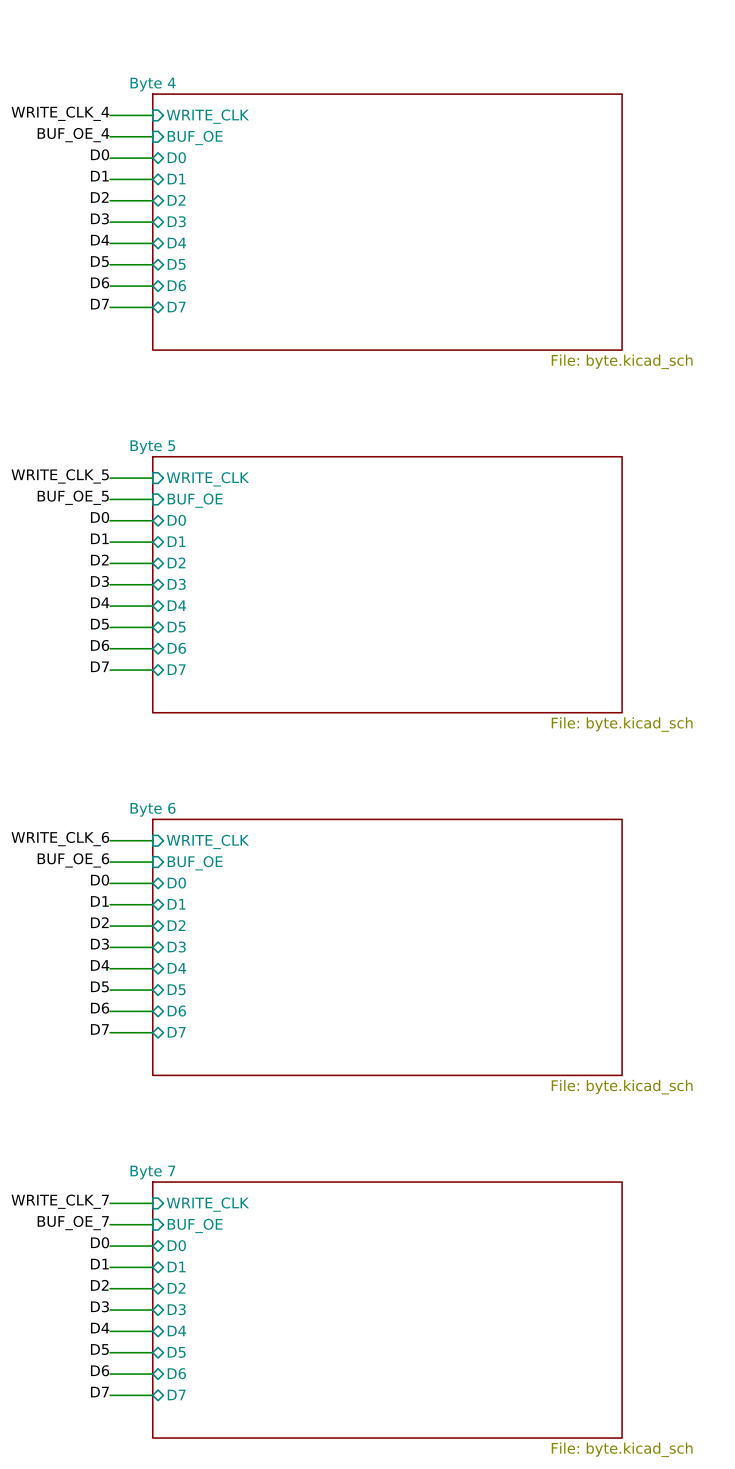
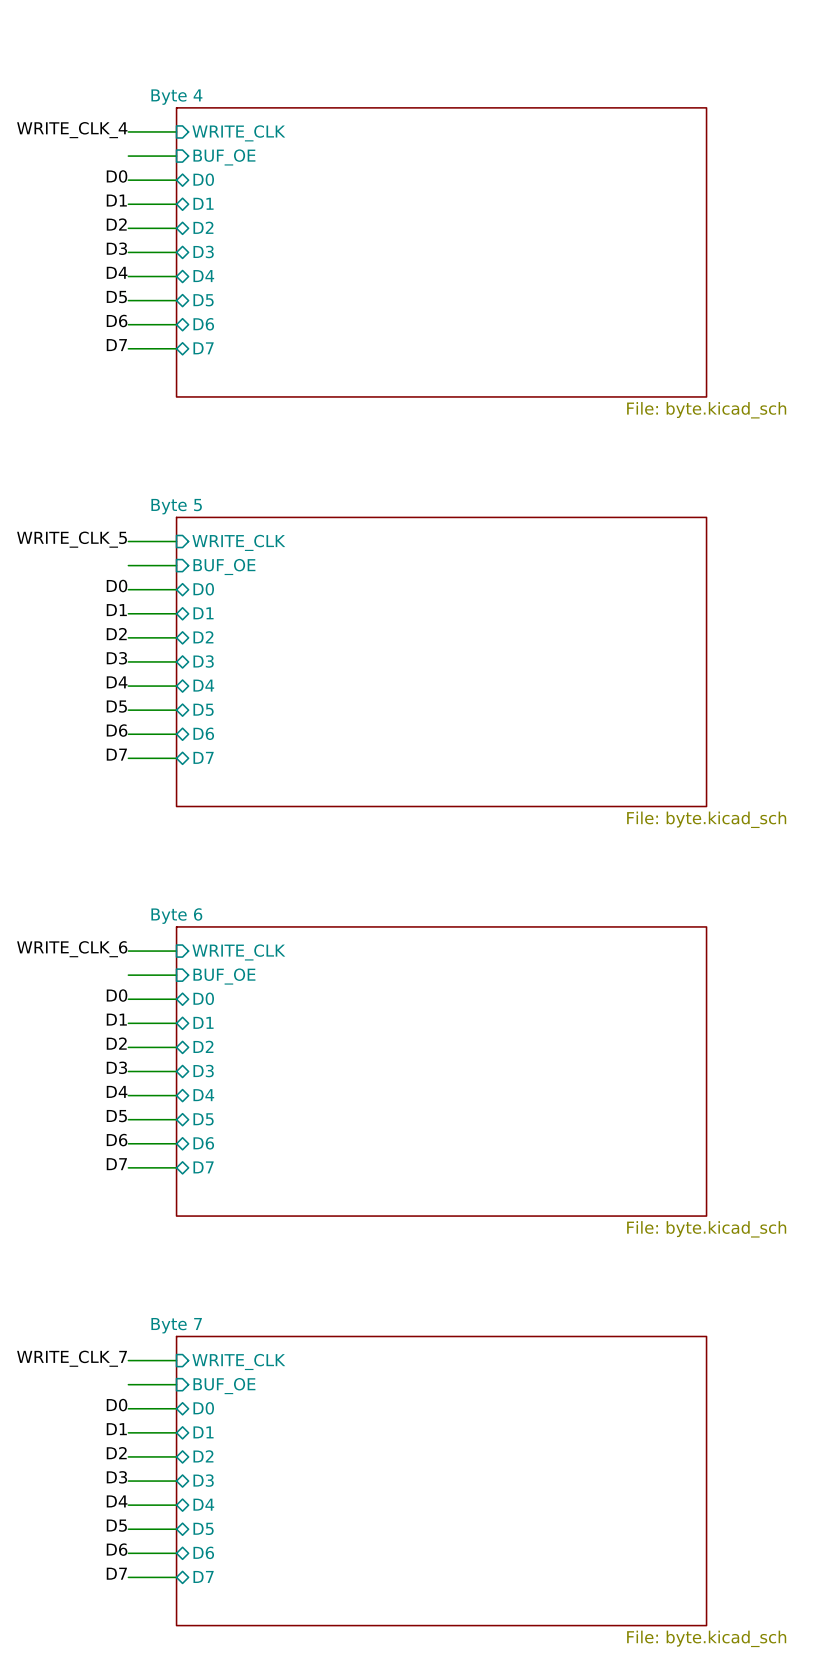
label: BUF_OE_4 (73, 135) -> none
label: BUF_OE_5 (73, 497) -> none
label: BUF_OE_6 (73, 860) -> none
label: BUF_OE_7 (73, 1223) -> none

